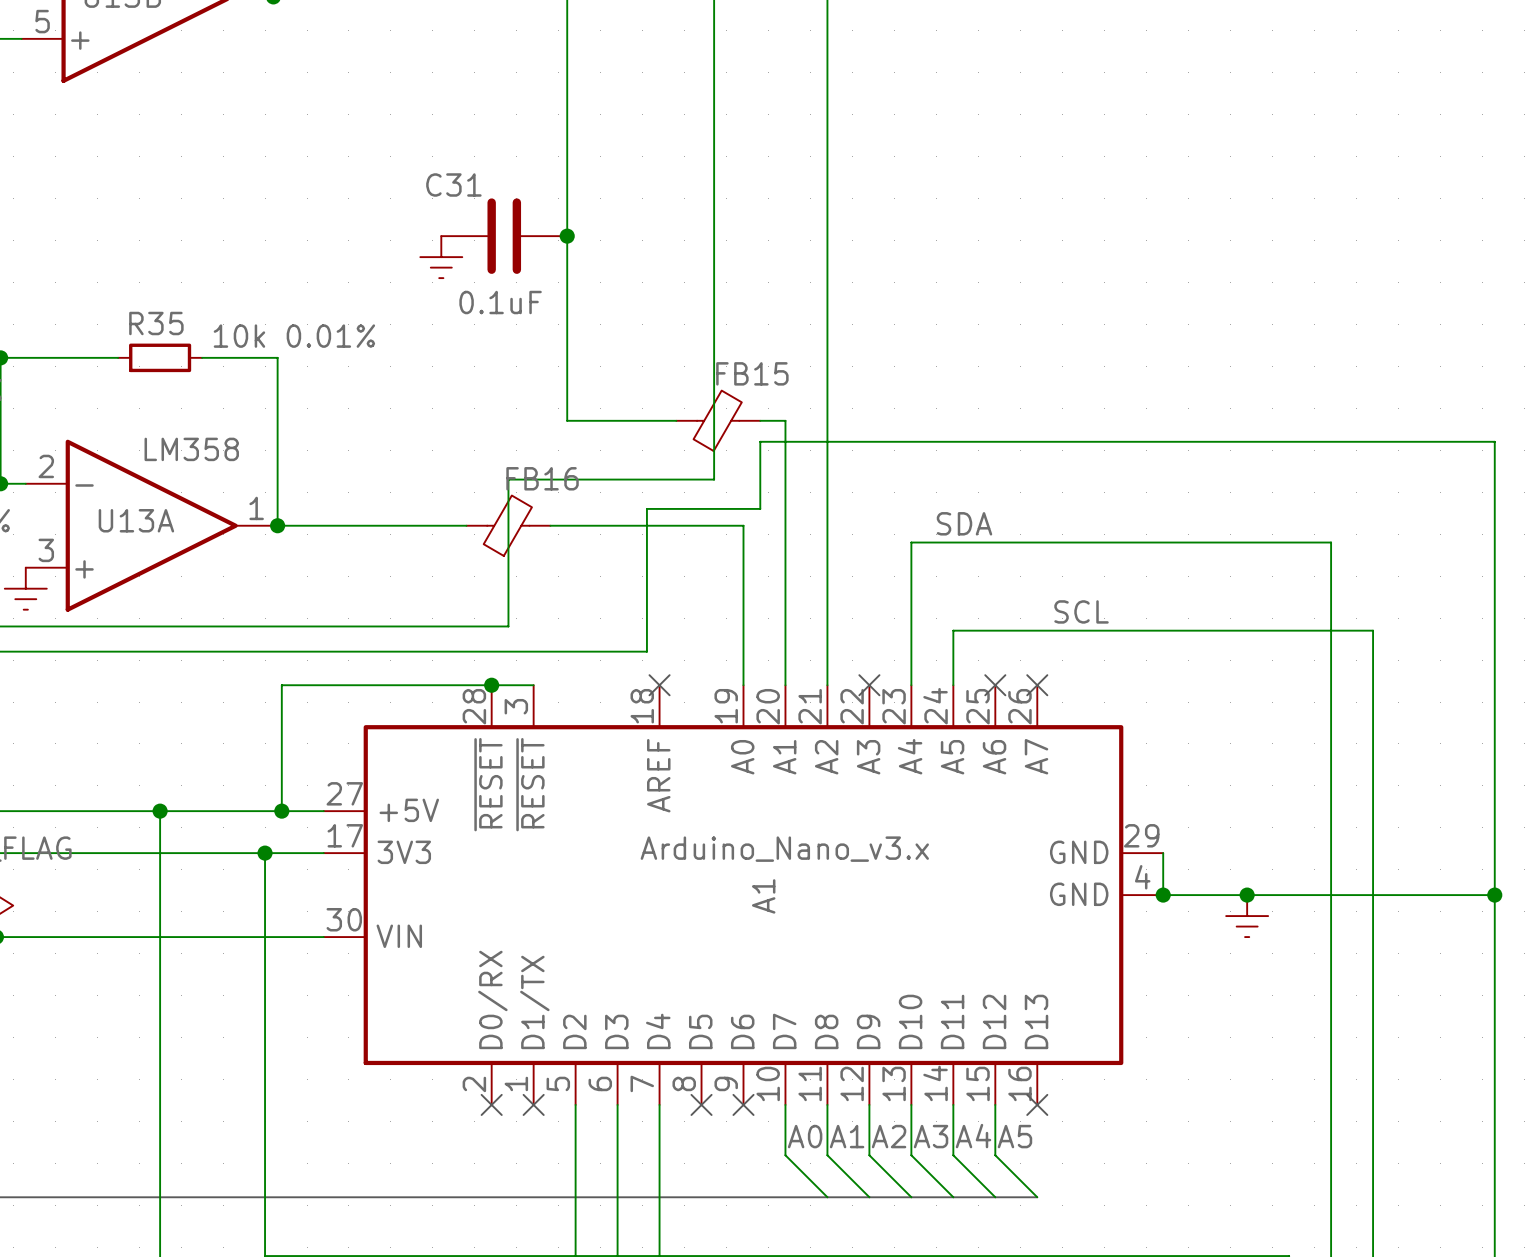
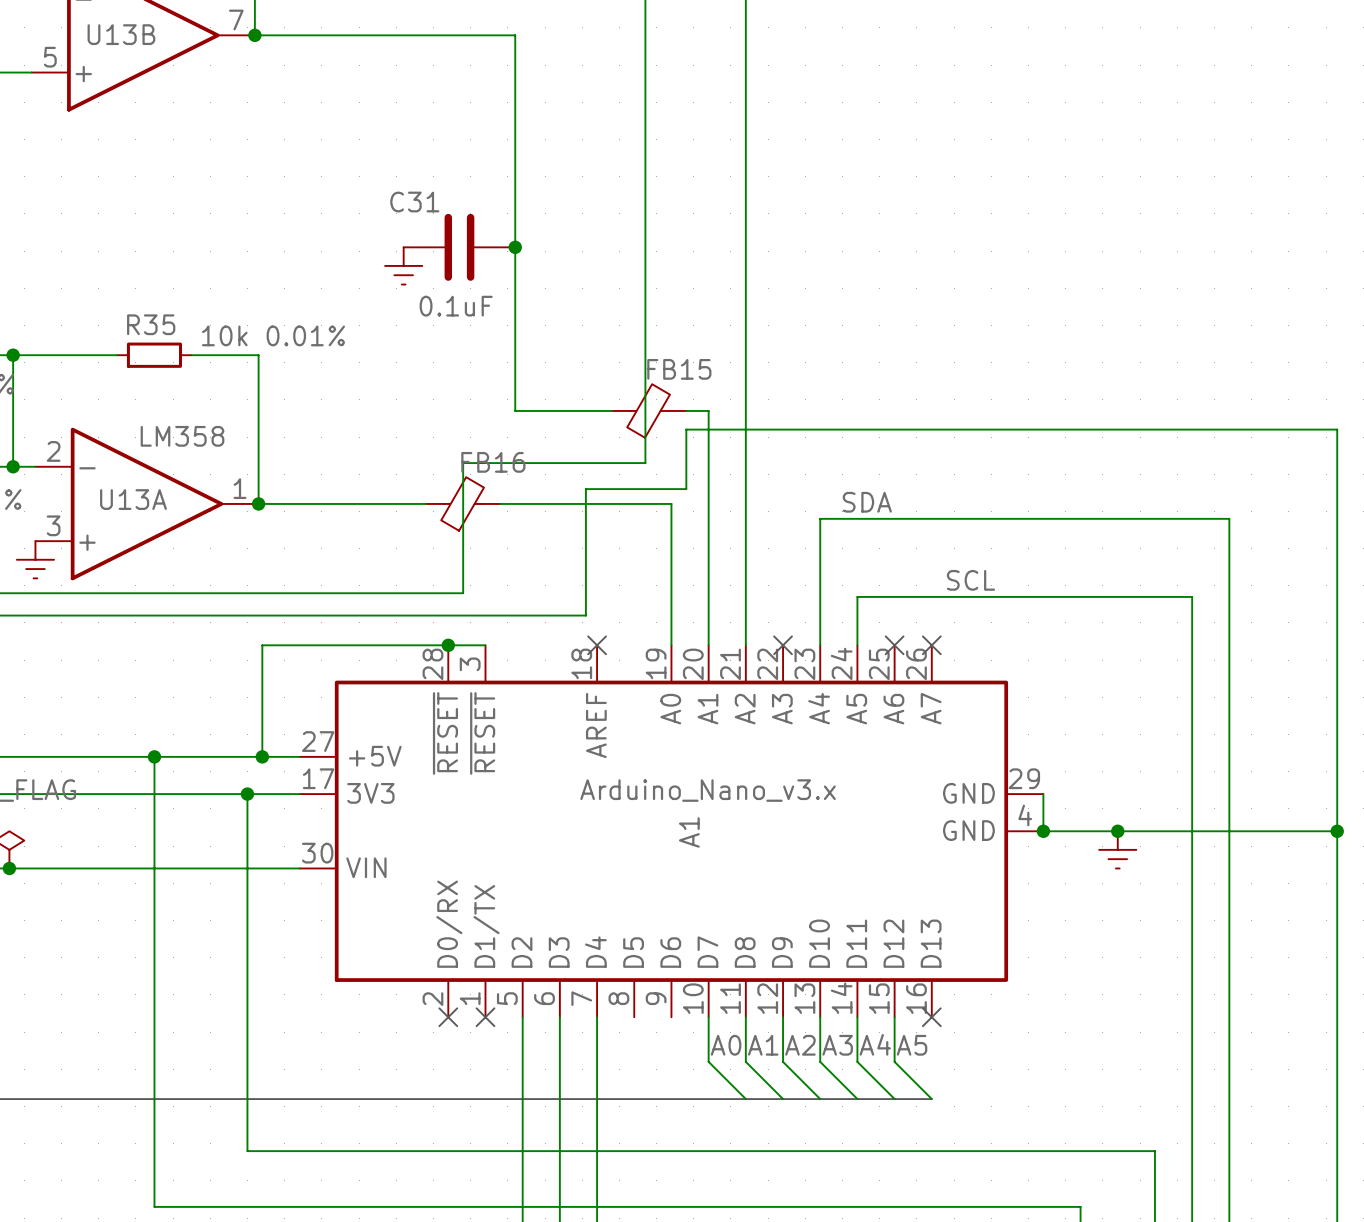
wire: (1331, 542) (1331, 630) (1373, 630) -> (1192, 518) (1229, 518) (1229, 596)
no-connect mark: (701, 1104) -> none
no-connect mark: (743, 1104) -> none

